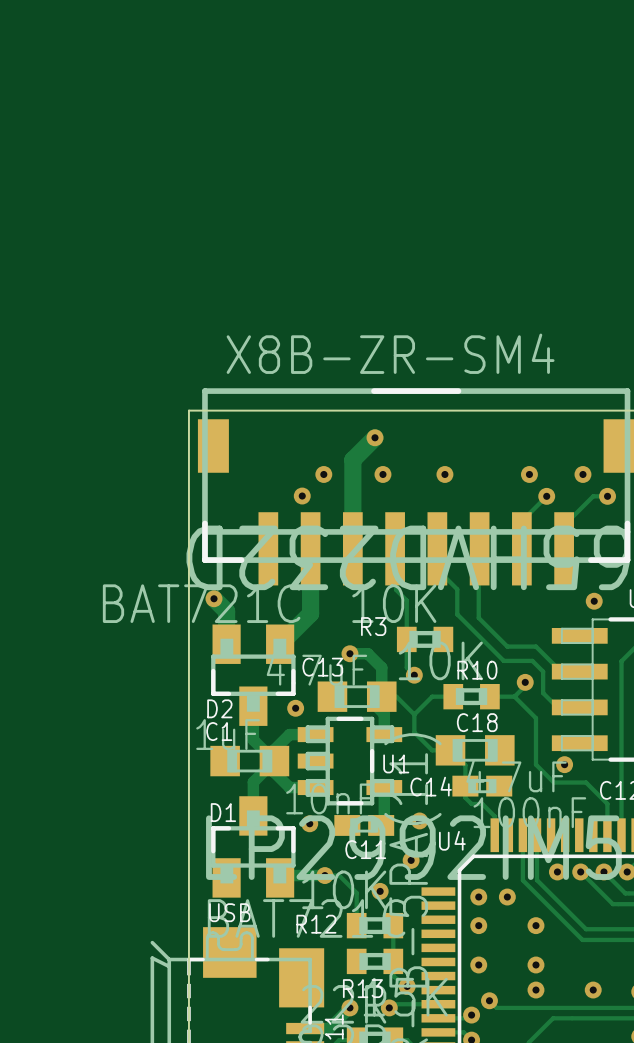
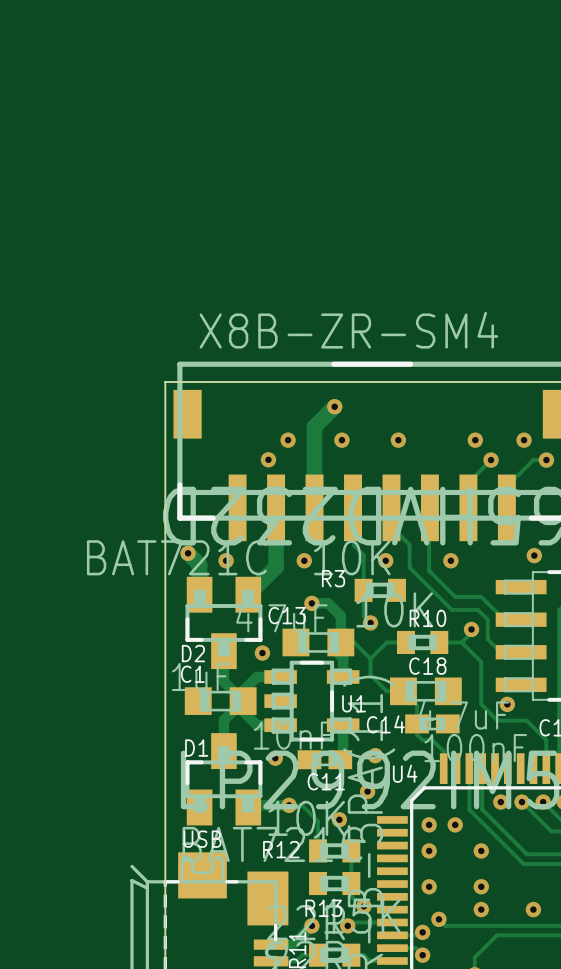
via: none -> (226, 560)
via: none -> (304, 560)
via: none -> (385, 560)
via: none -> (450, 560)

